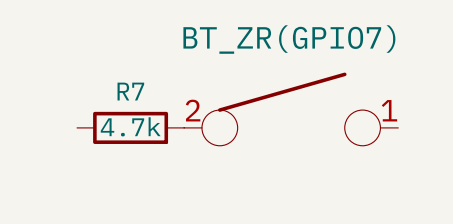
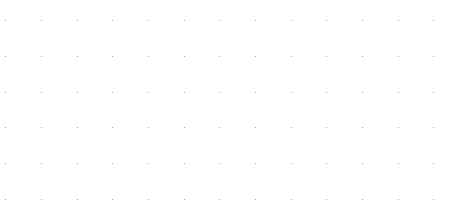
BT_ZR(GPIO7): (291, 109) -> none
R7: 4.7k (130, 127) -> none

